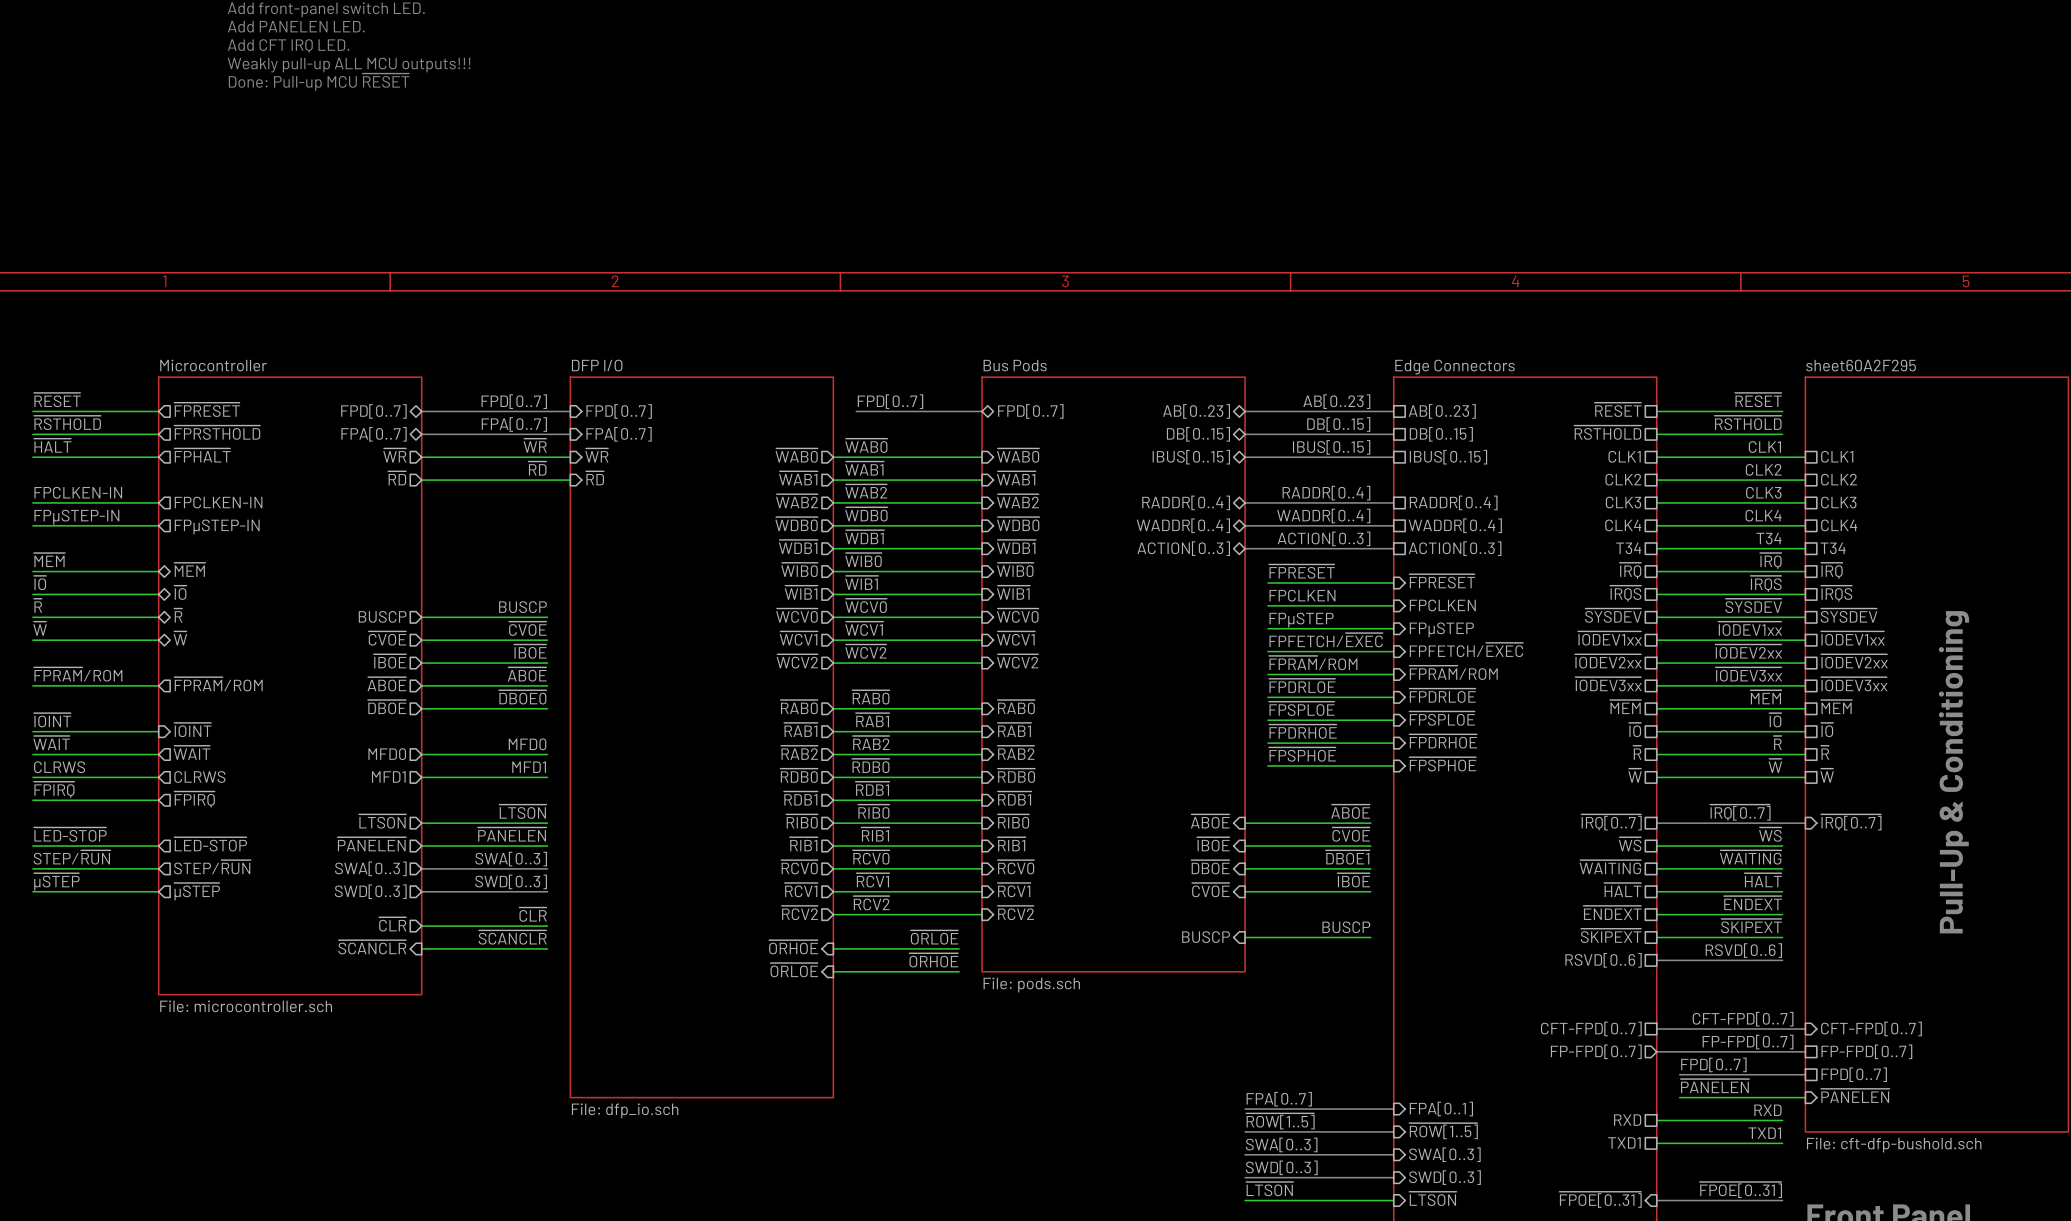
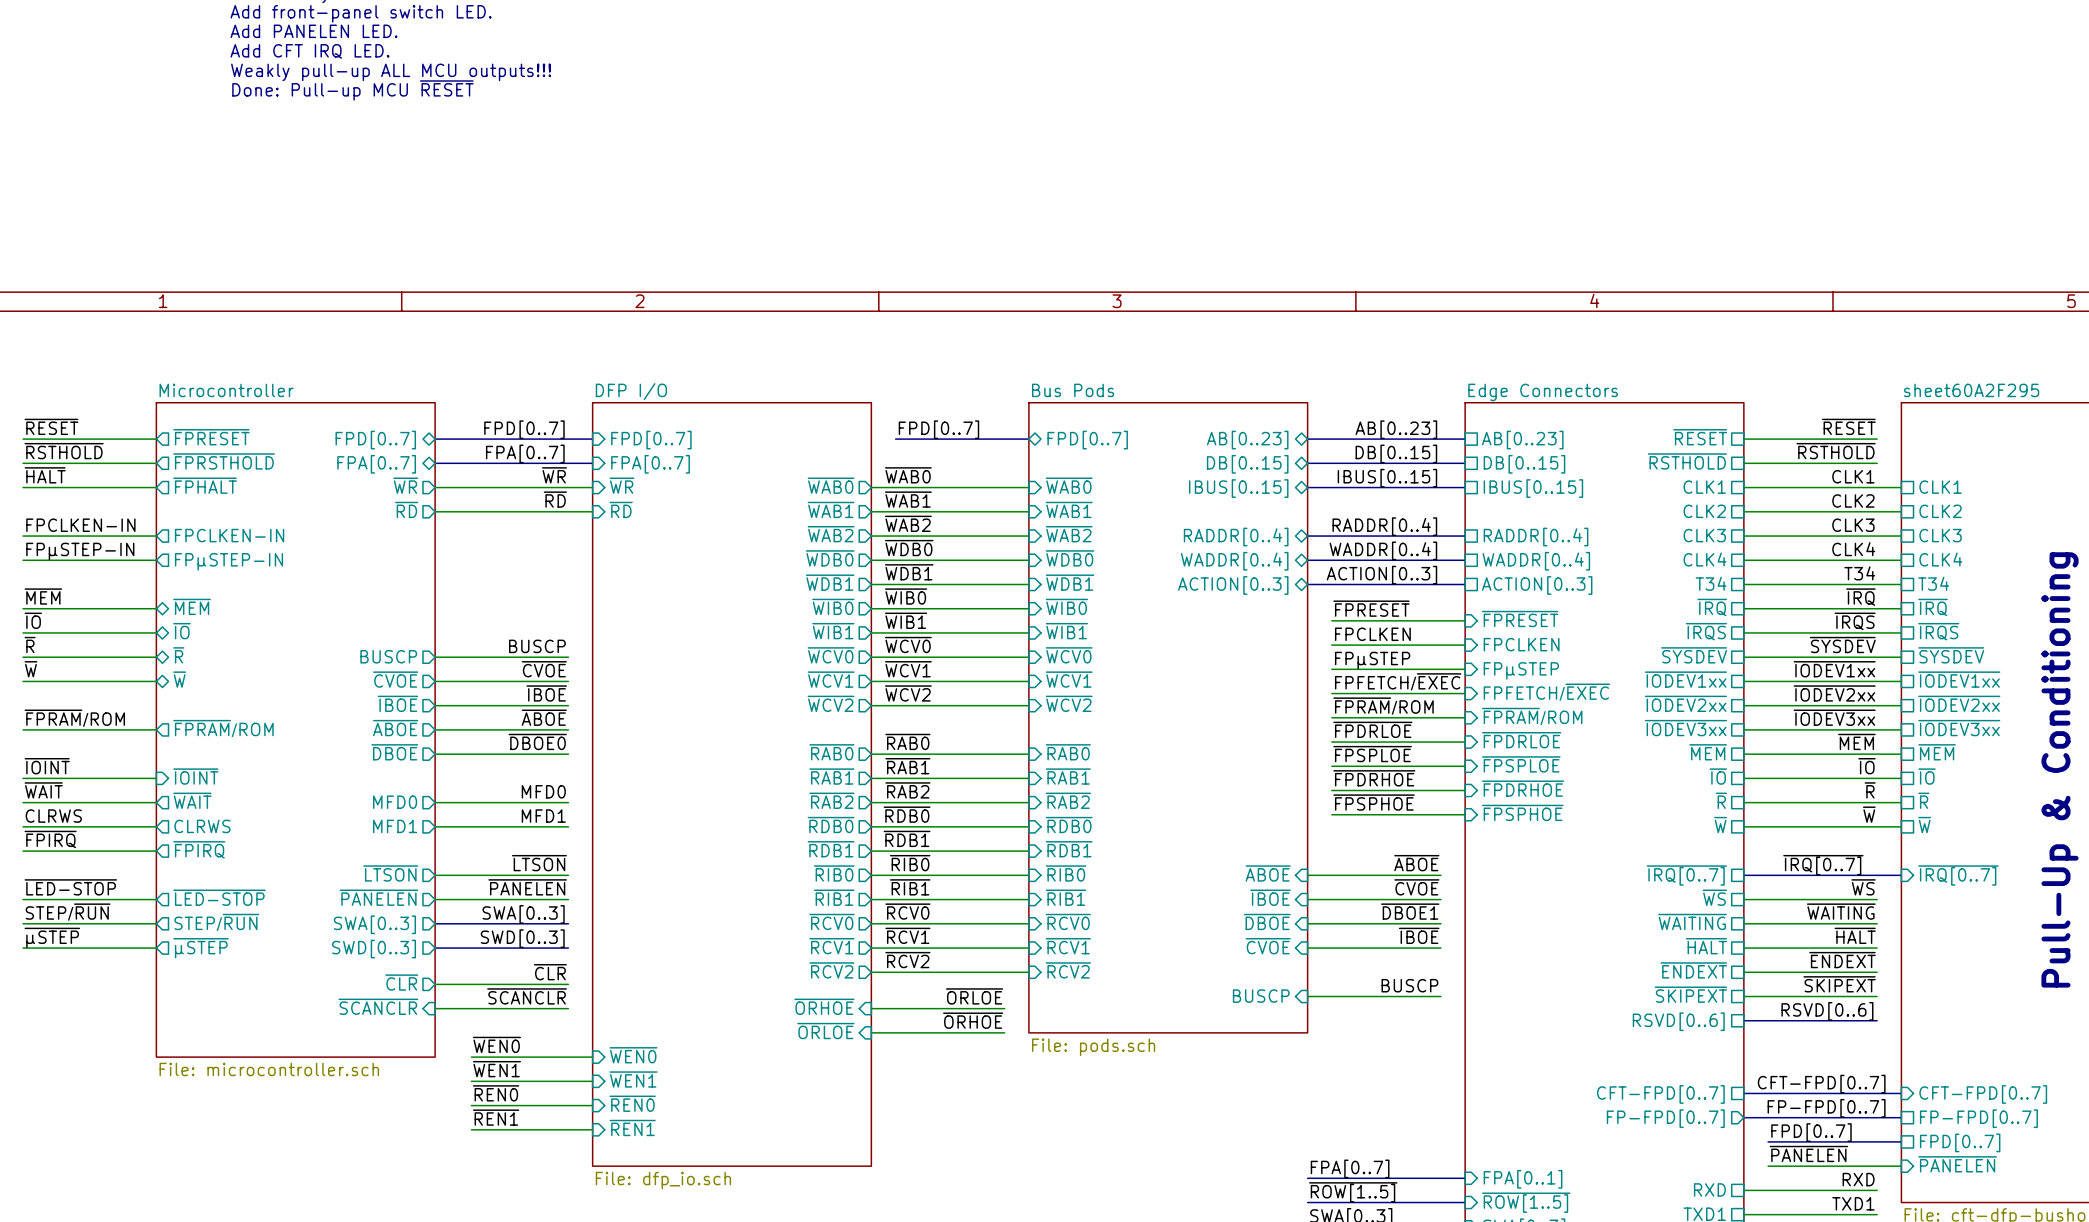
label: none -> ~{WEN0} (496, 1044)
sheet pin: none -> ~{WEN0} (633, 1055)
wire: none -> (471, 1057) (592, 1057)
label: none -> ~{WEN1} (496, 1069)
sheet pin: none -> ~{WEN1} (633, 1079)
wire: none -> (471, 1081) (592, 1081)
label: none -> ~{REN0} (496, 1093)
sheet pin: none -> ~{REN0} (632, 1103)
wire: none -> (471, 1105) (592, 1105)
label: none -> ~{REN1} (496, 1117)
sheet pin: none -> ~{REN1} (632, 1127)
wire: none -> (471, 1129) (592, 1129)

